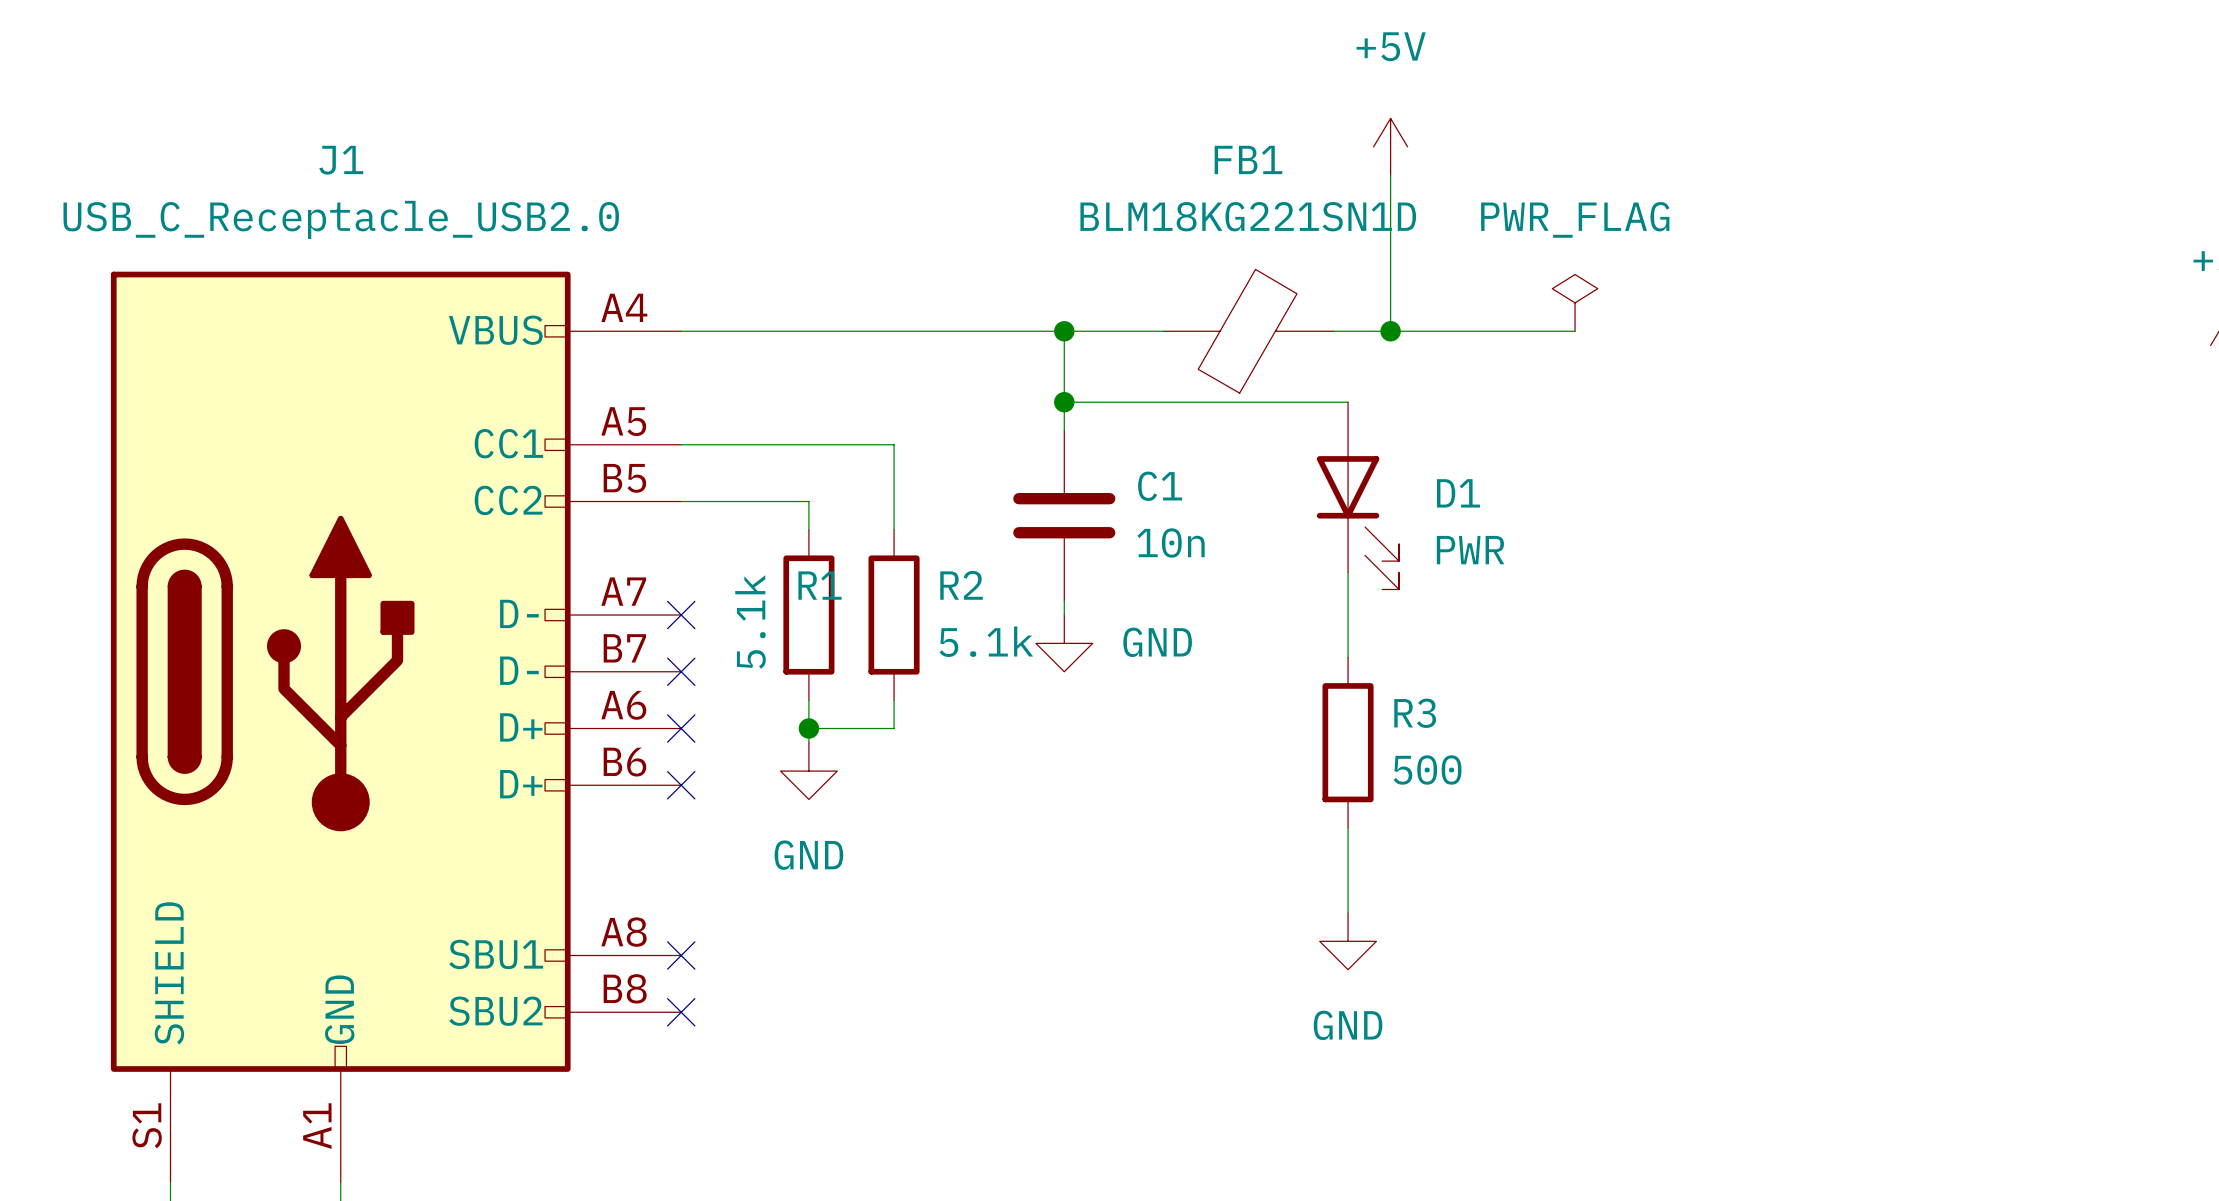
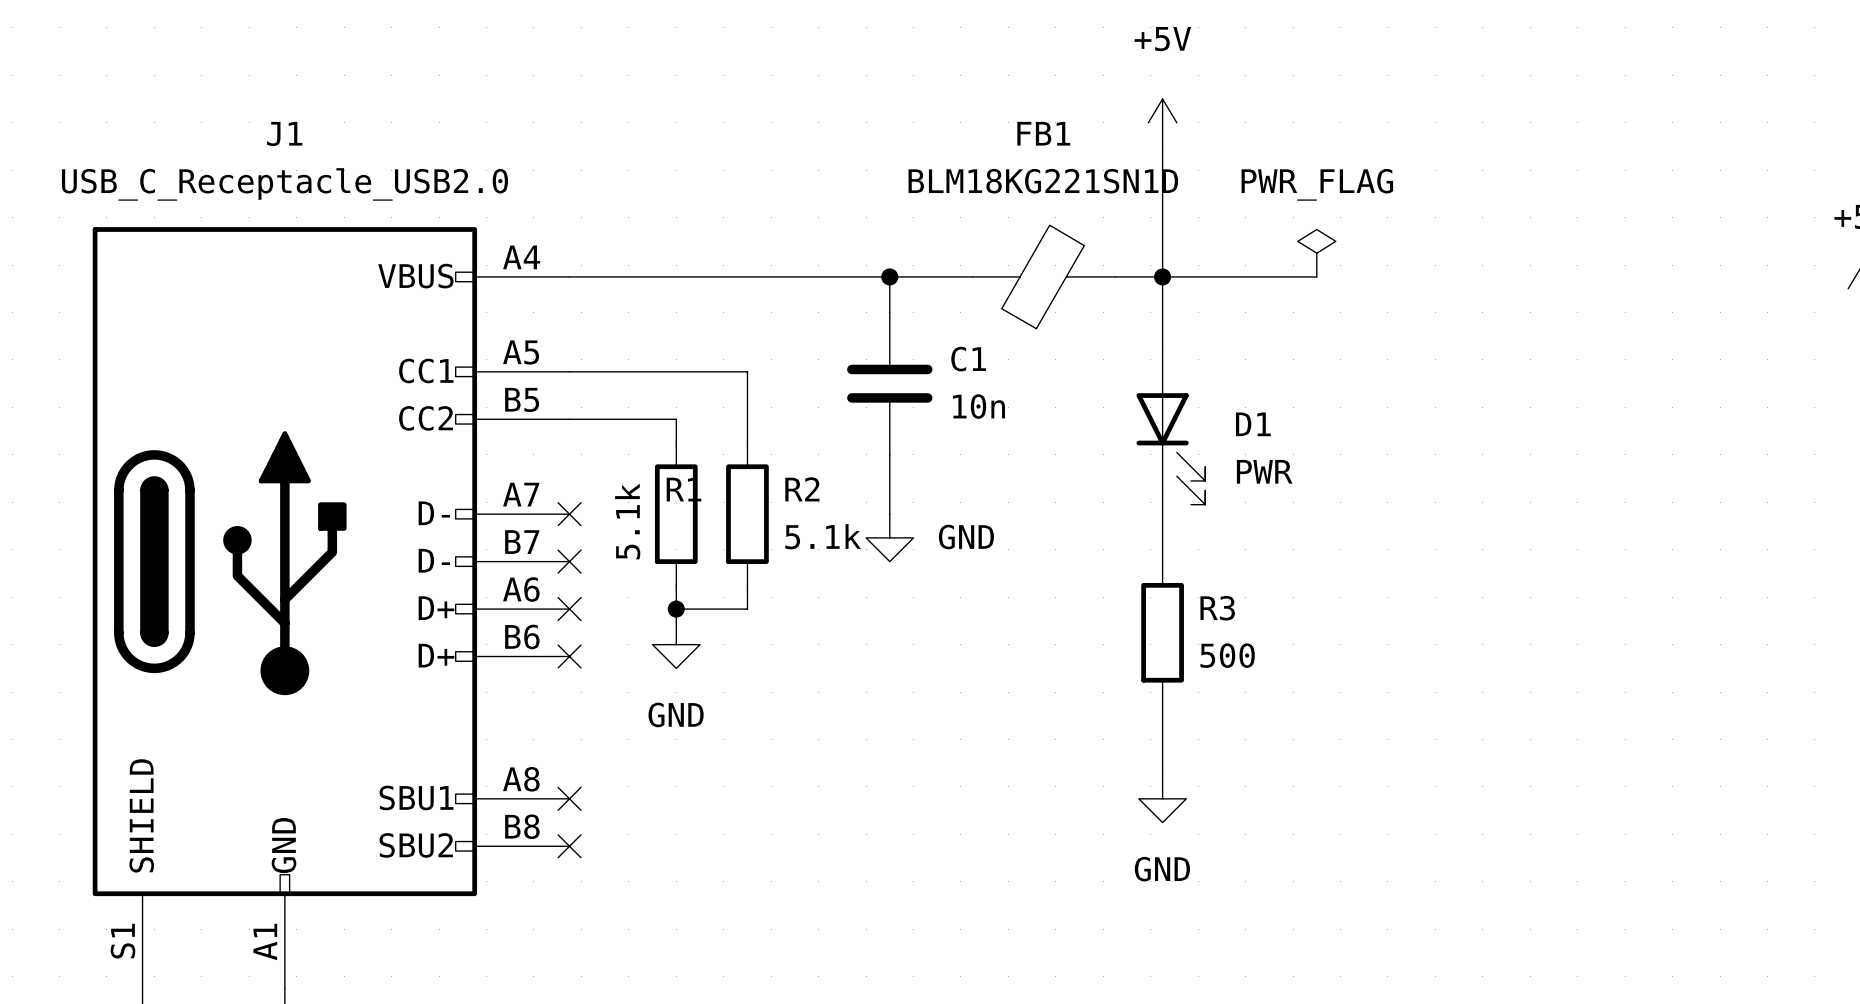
wire: none -> (1162, 276) (1162, 348)
wire: (1064, 402) (1348, 402) -> none
junction: (1064, 402) -> none
D1 position: (1357, 495) -> (1170, 426)
C1 position: (1064, 515) -> (889, 383)
wire: (1348, 572) (1348, 657) -> (1162, 490) (1162, 561)
R3 position: (1348, 742) -> (1162, 632)
wire: (1348, 827) (1348, 912) -> (1162, 703) (1162, 775)
power symbol position: GND (1348, 941) -> GND (1162, 798)

